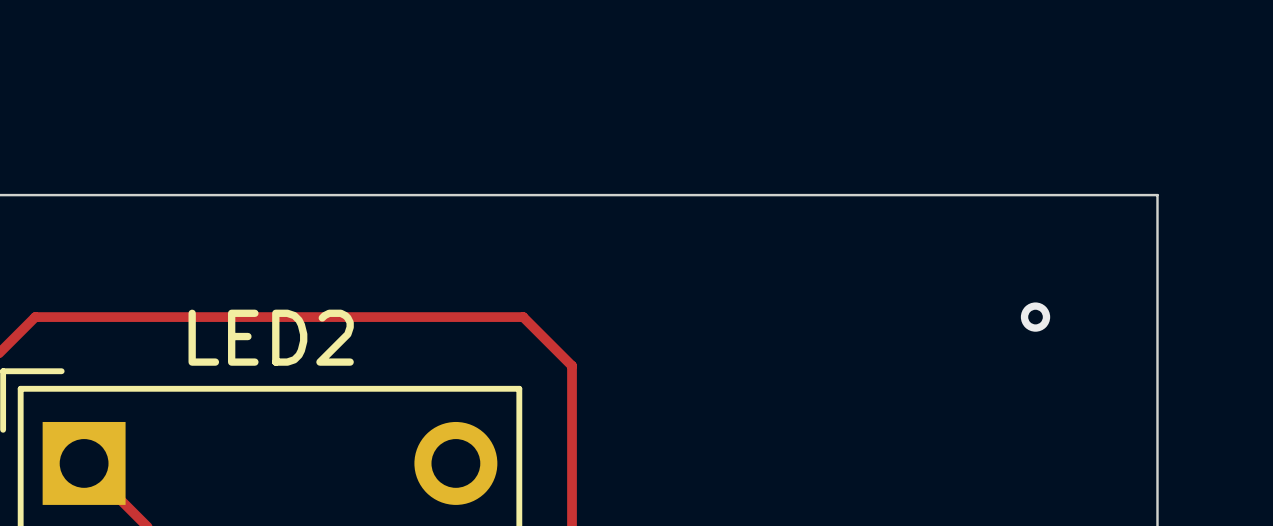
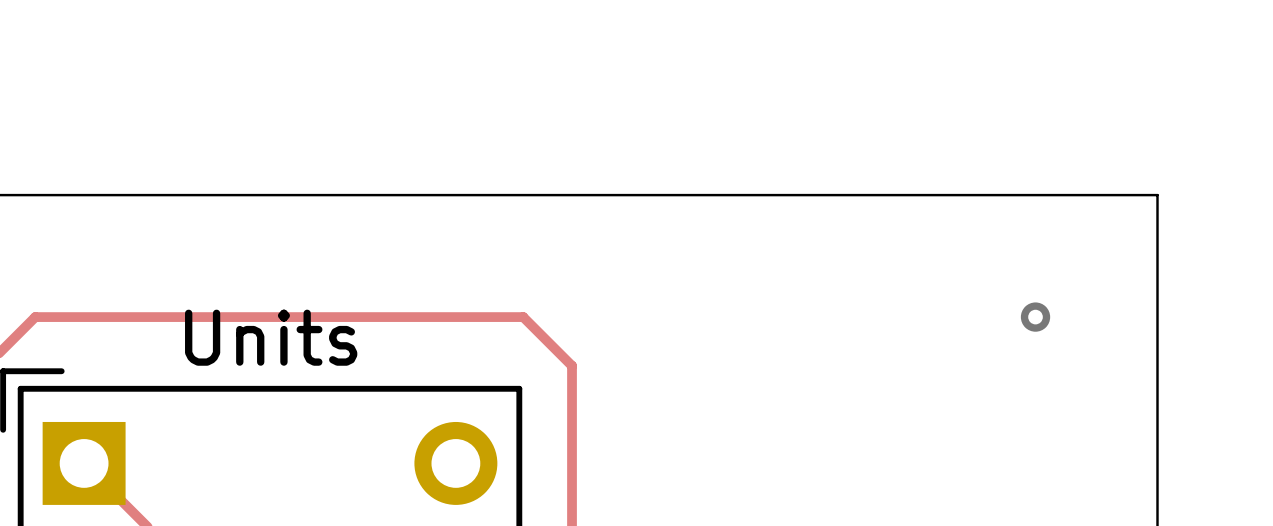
LED2 name: LED2 (271, 337) -> Units (271, 337)

